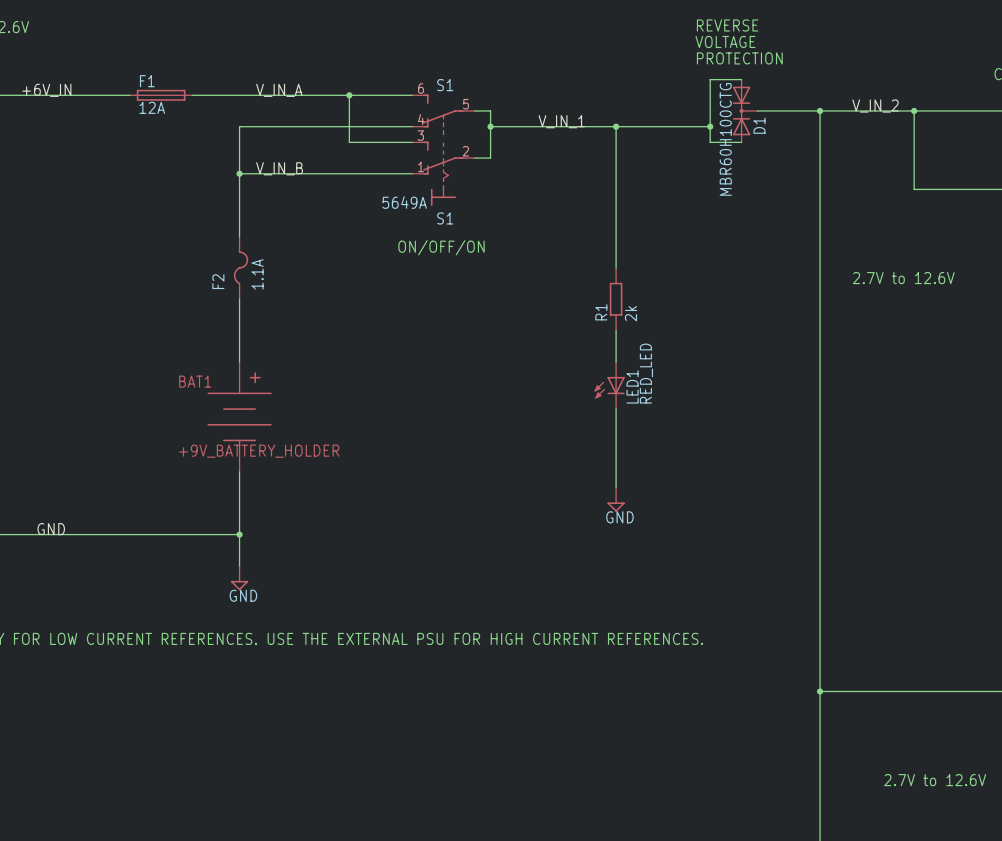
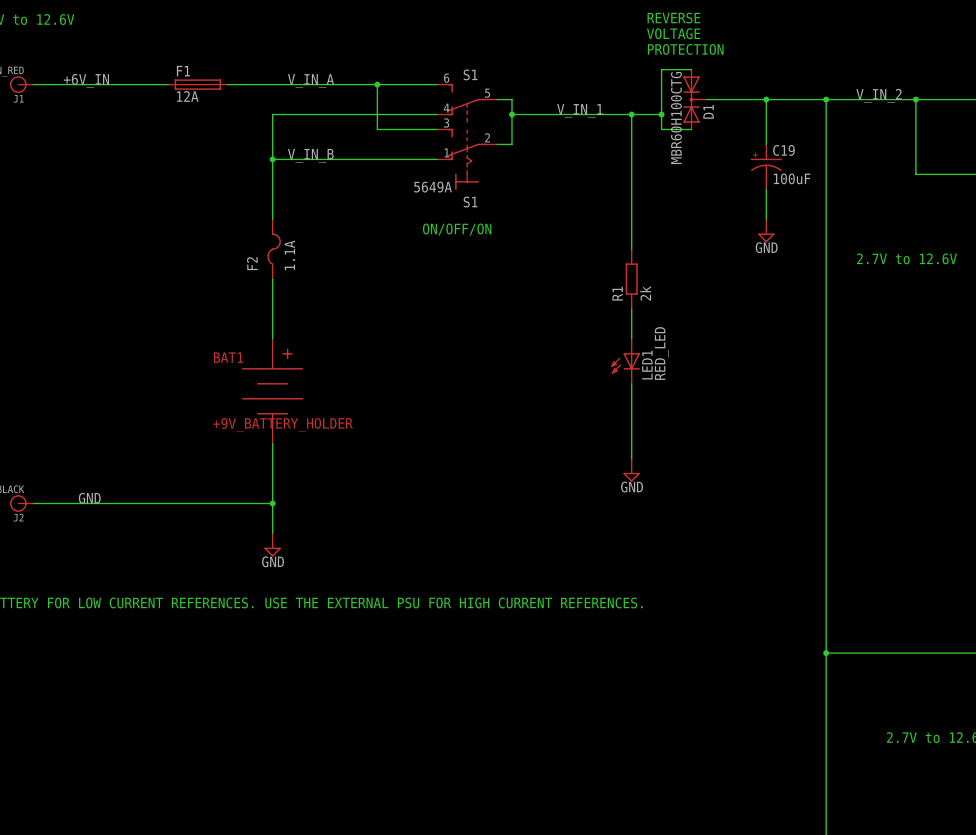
text position: REVERSE (727, 25) -> REVERSE (673, 18)
text position: VOLTAGE (725, 41) -> VOLTAGE (673, 33)
text position: PROTECTION (739, 58) -> PROTECTION (685, 49)
wire: (741, 79) (710, 79) (710, 142) (741, 142) -> (691, 69) (661, 69) (661, 129) (691, 129)
wire: none -> (706, 99) (766, 99) (766, 144)
D1 position: (745, 110) -> (694, 99)
junction: none -> (766, 99)
wire: (647, 126) (710, 126) -> none
junction: none -> (661, 114)
junction: (710, 126) -> none
C19: none -> 100uF (766, 166)
wire: none -> (766, 189) (766, 219)
power symbol: none -> GND (766, 230)

